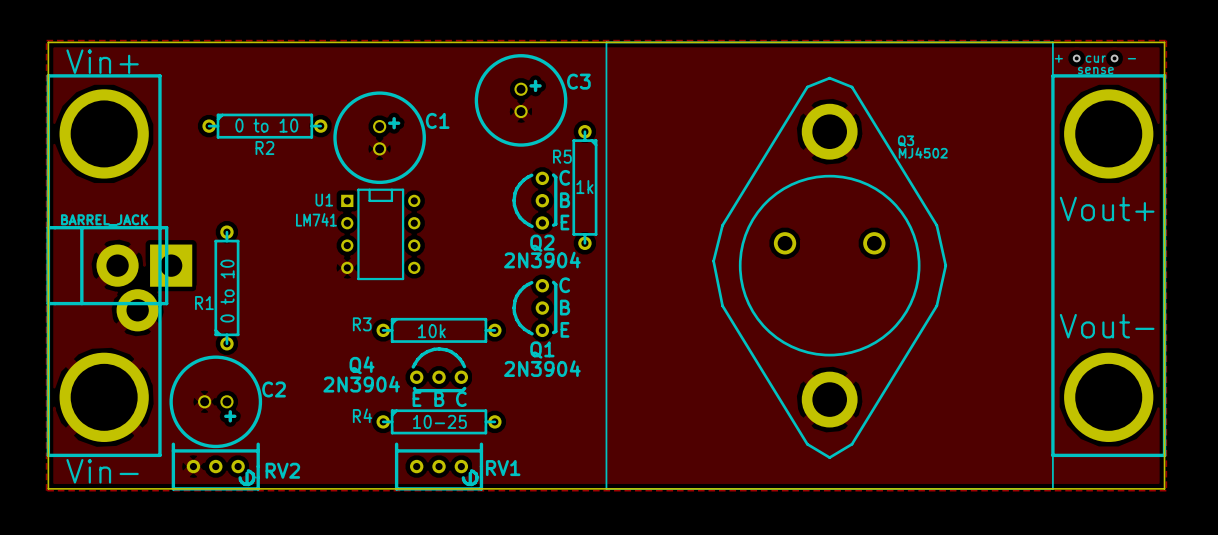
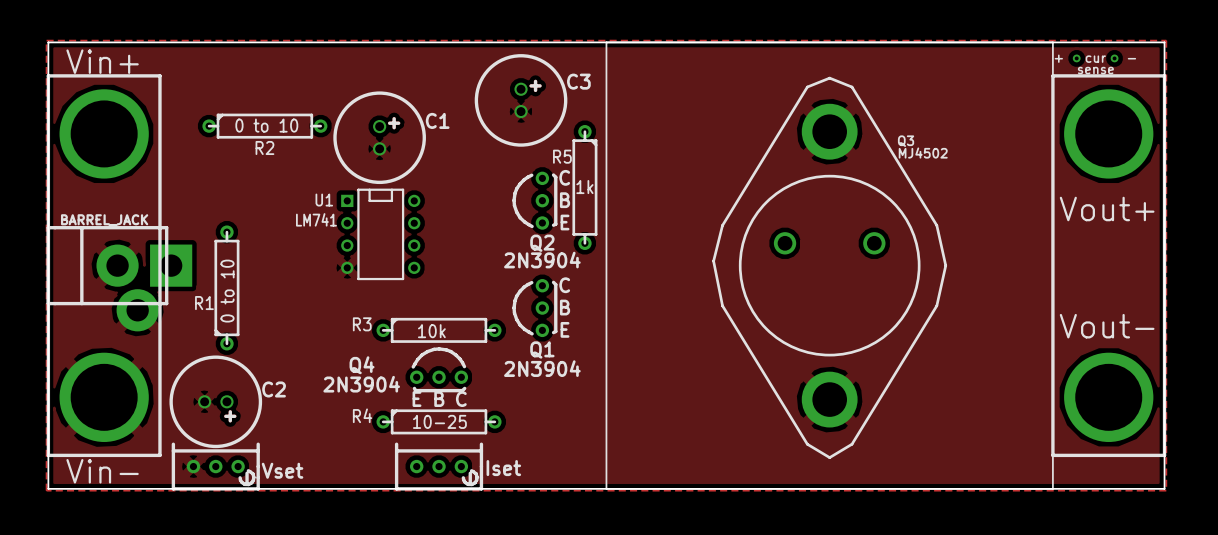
RV1 name: RV1 (503, 468) -> Iset (503, 468)
RV2 name: RV2 (282, 470) -> Vset (282, 470)

